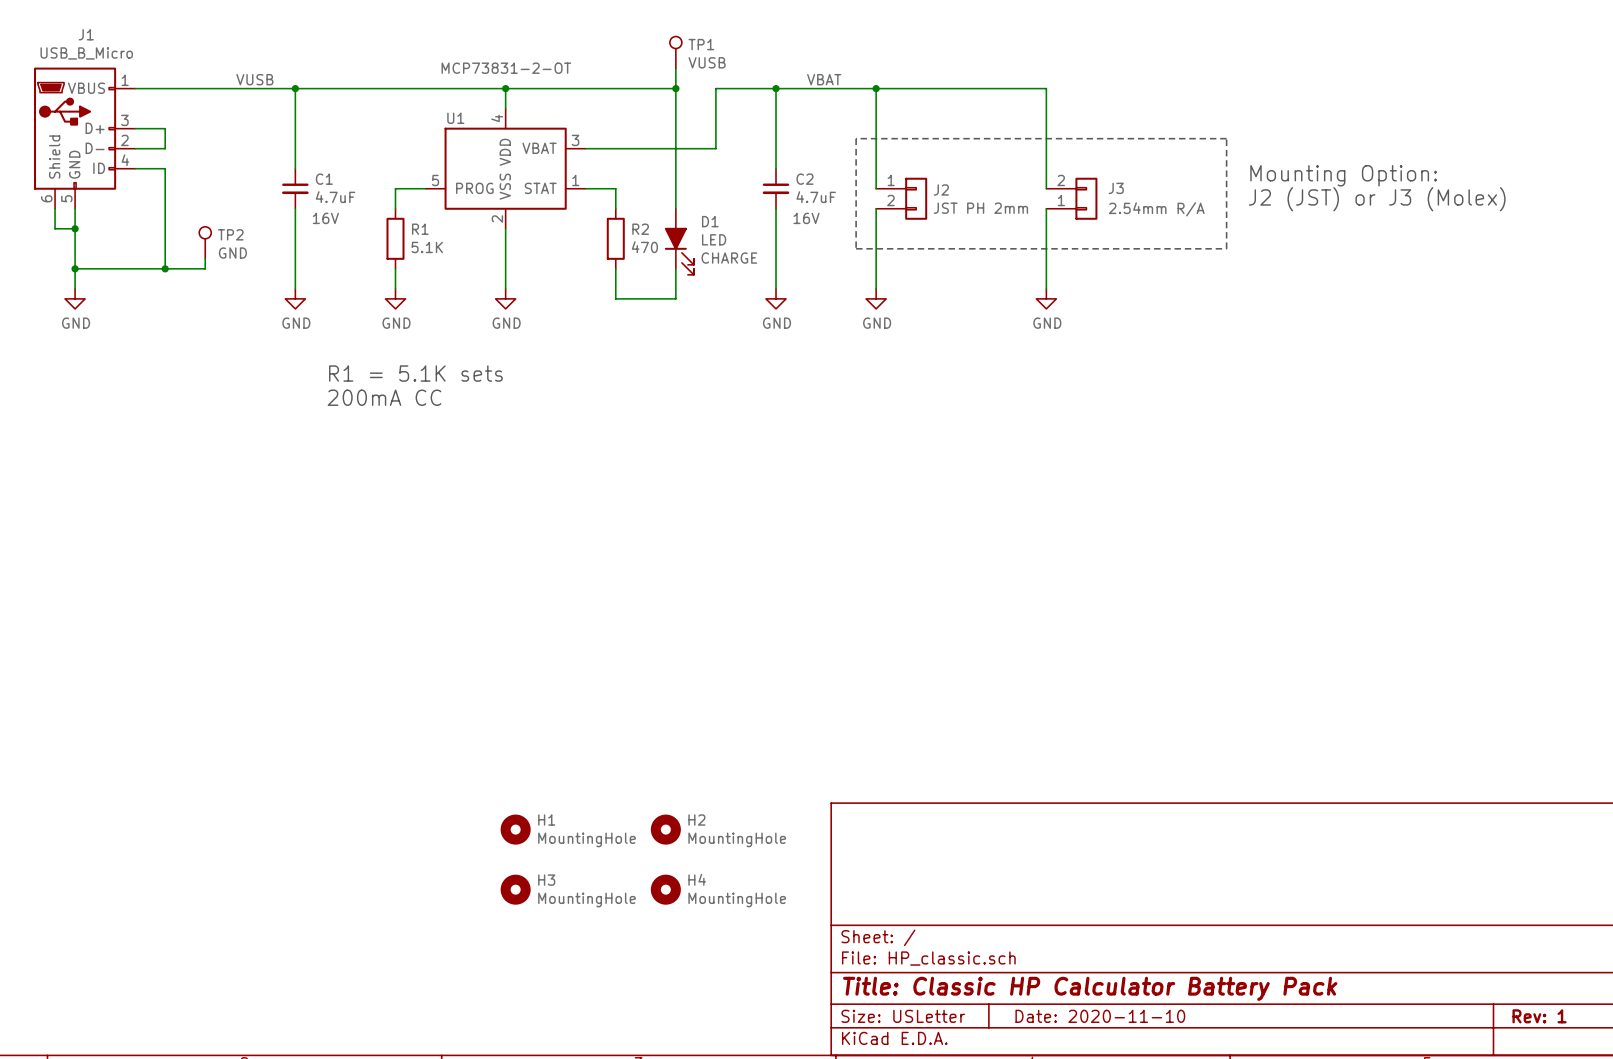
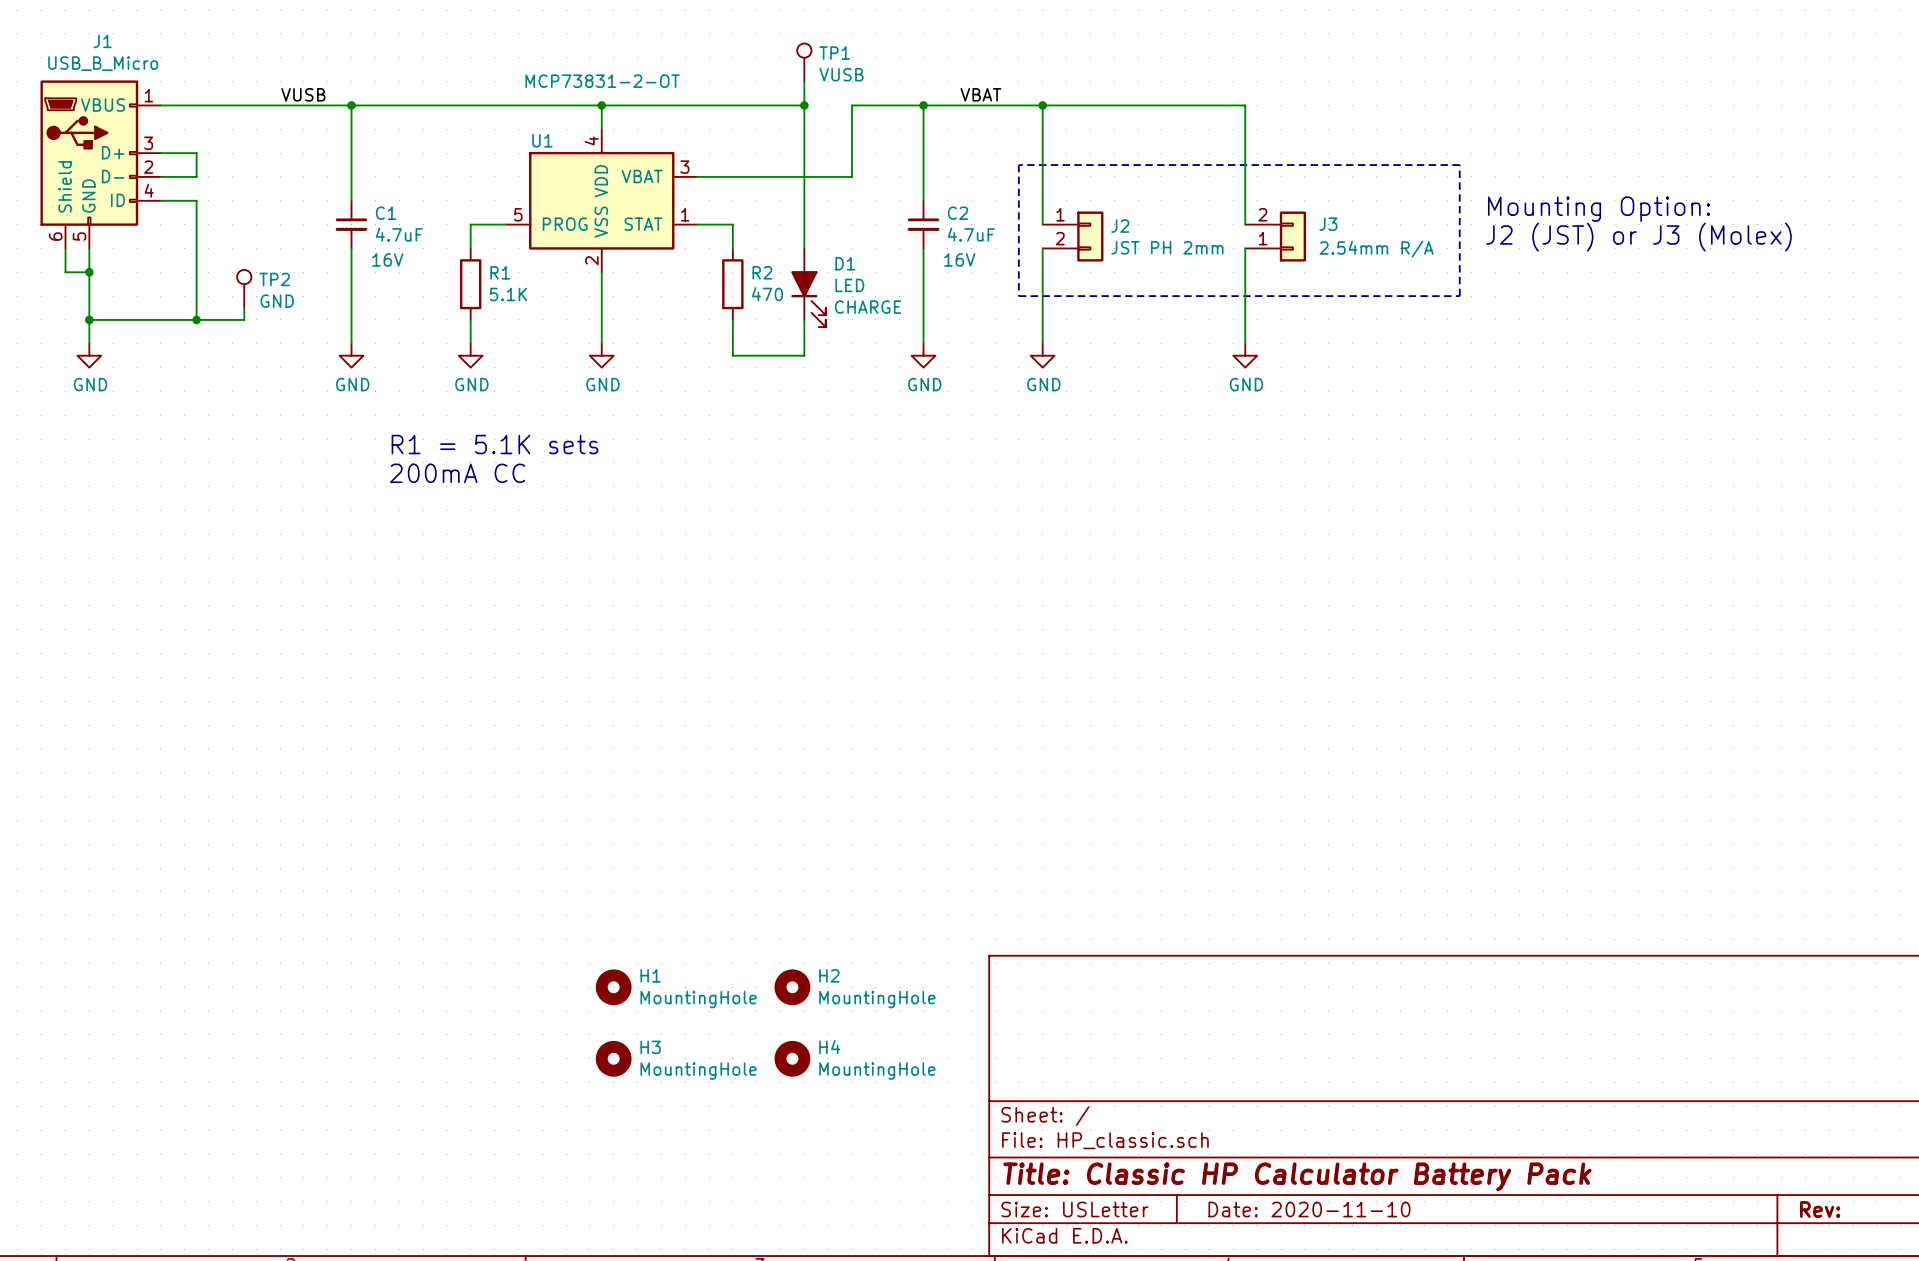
title block: Rev: 1 (1539, 1016) -> Rev: (1820, 1209)

